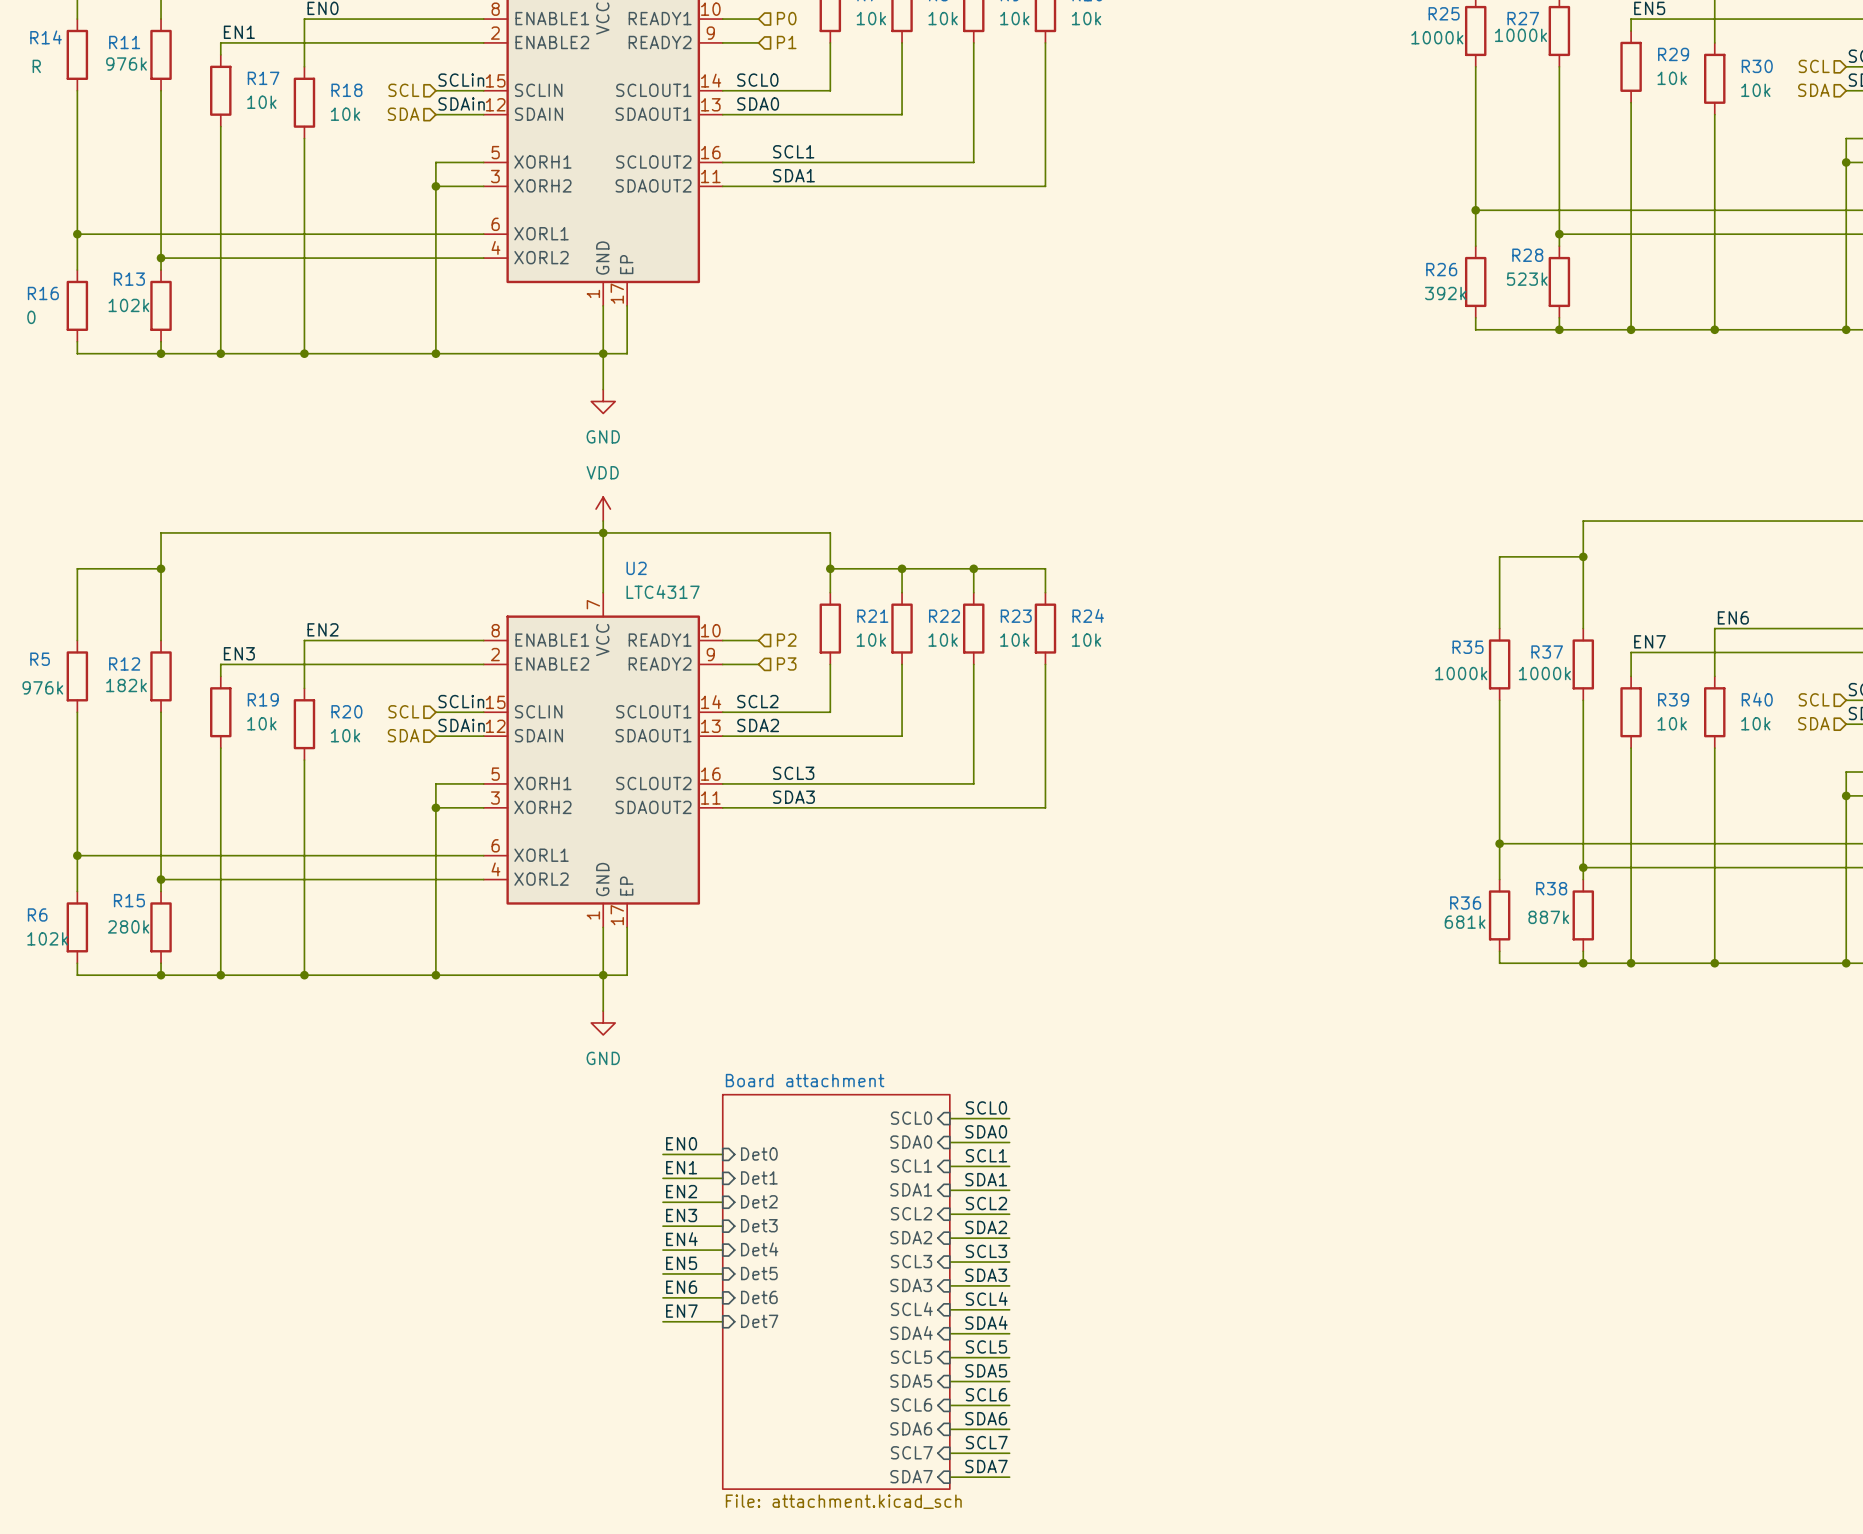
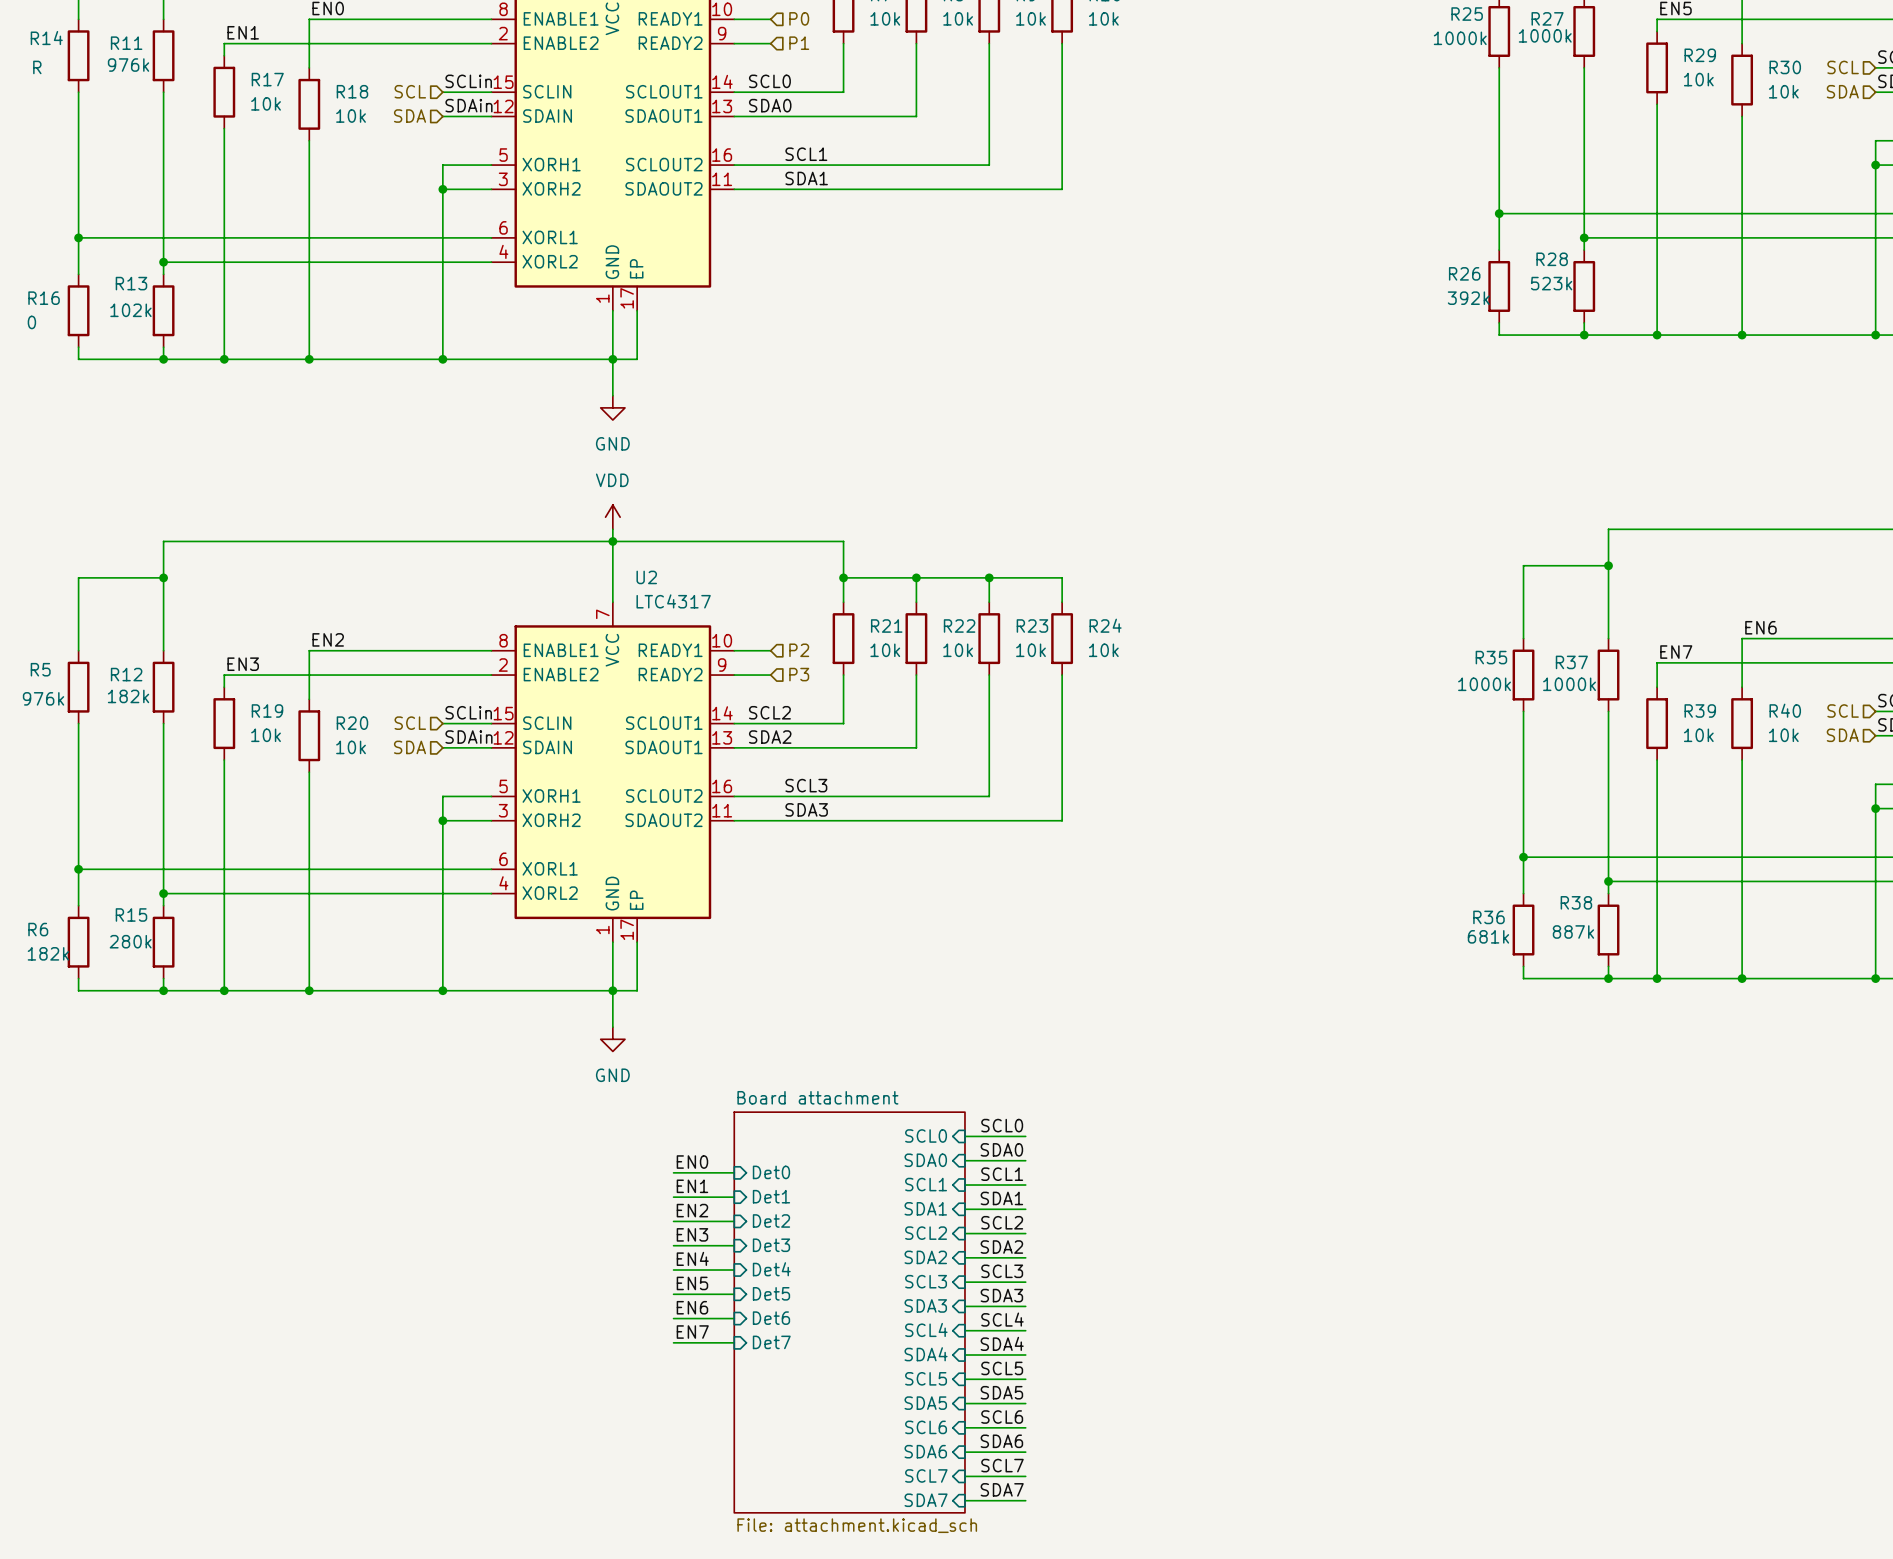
R6 value: 102k (47, 938) -> 182k (48, 953)

